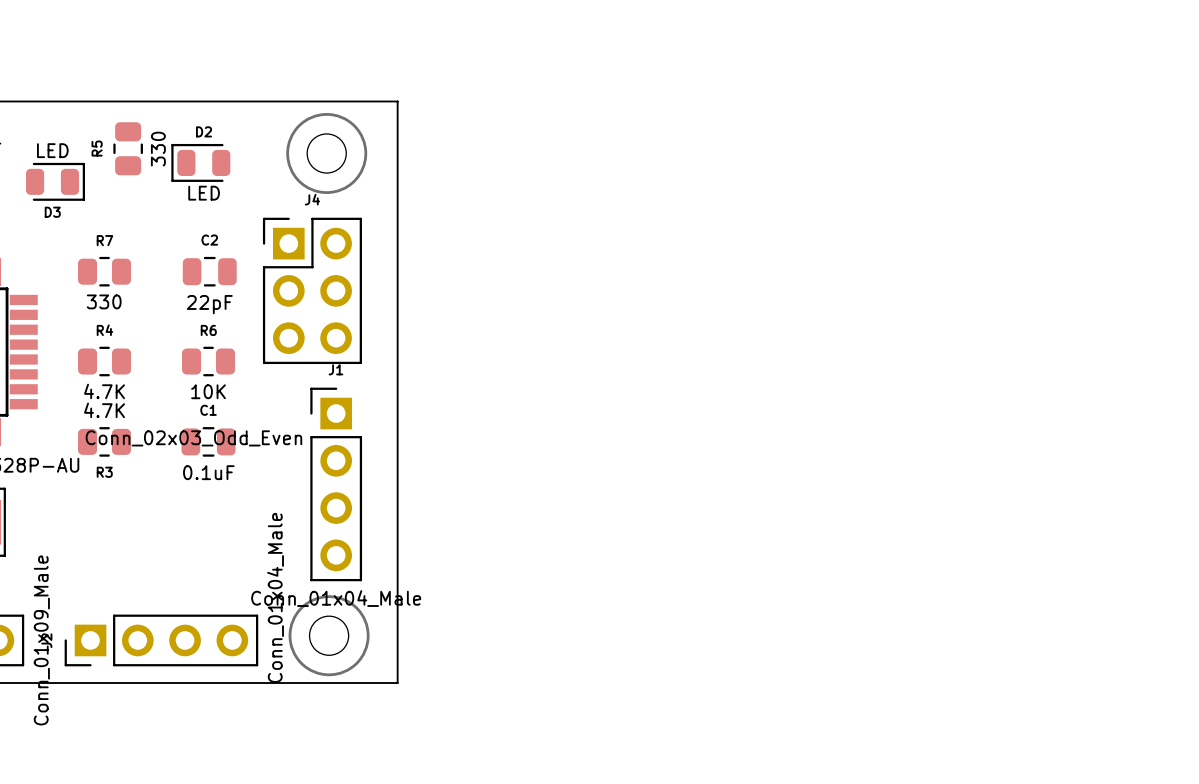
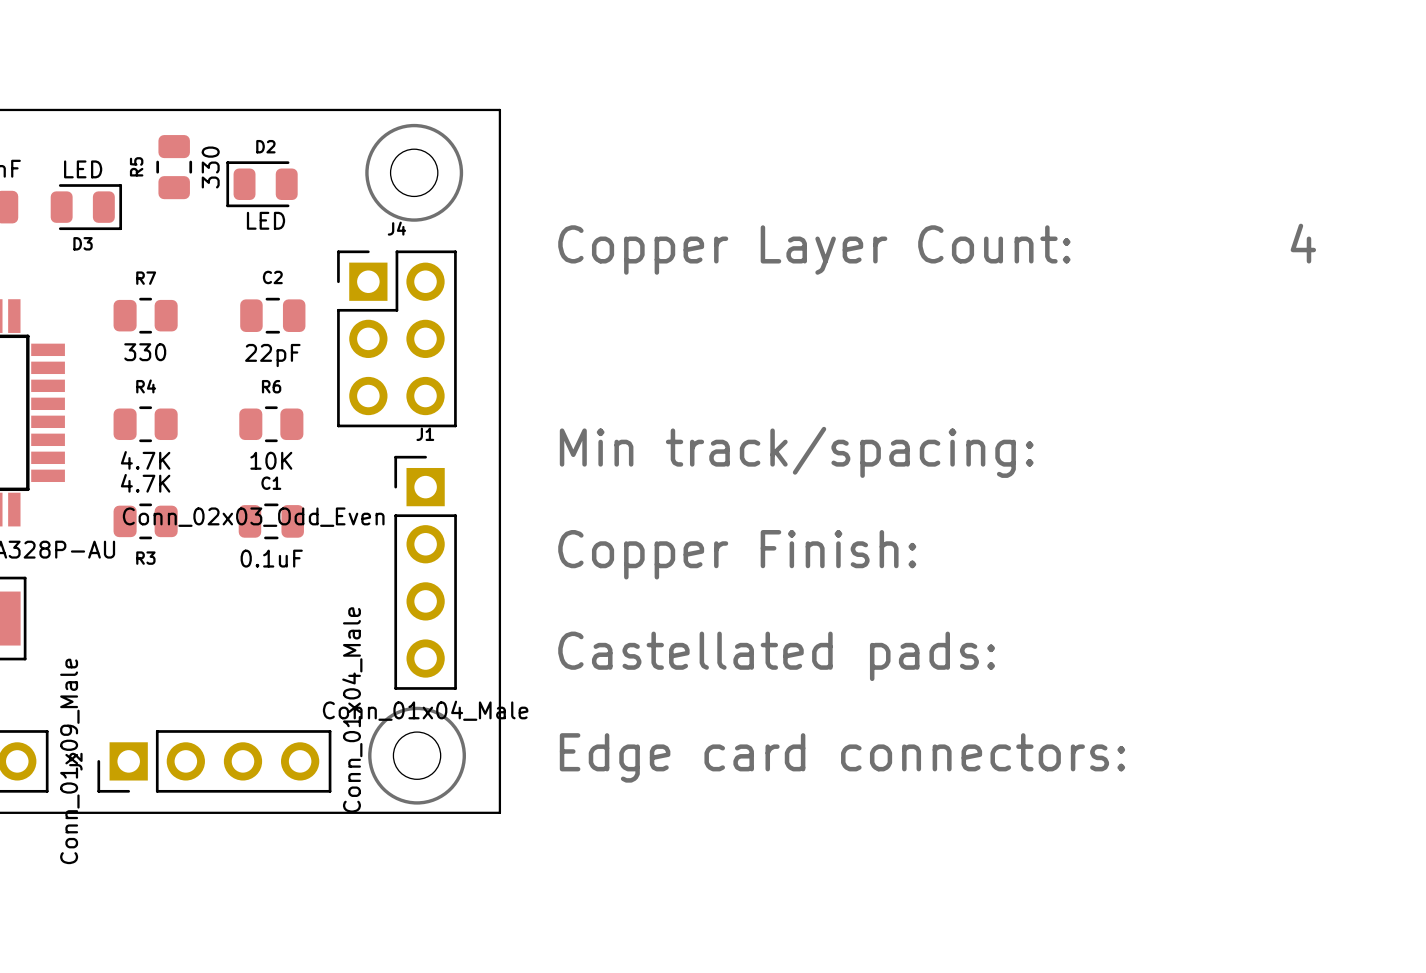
text: none -> 4 (1303, 243)
text: none -> Copper Layer Count: (814, 250)
text: none -> Min track/spacing: (796, 452)
text: none -> Copper Finish: (737, 554)
text: none -> Castellated pads: (776, 656)
text: none -> Edge card connectors: (842, 757)

